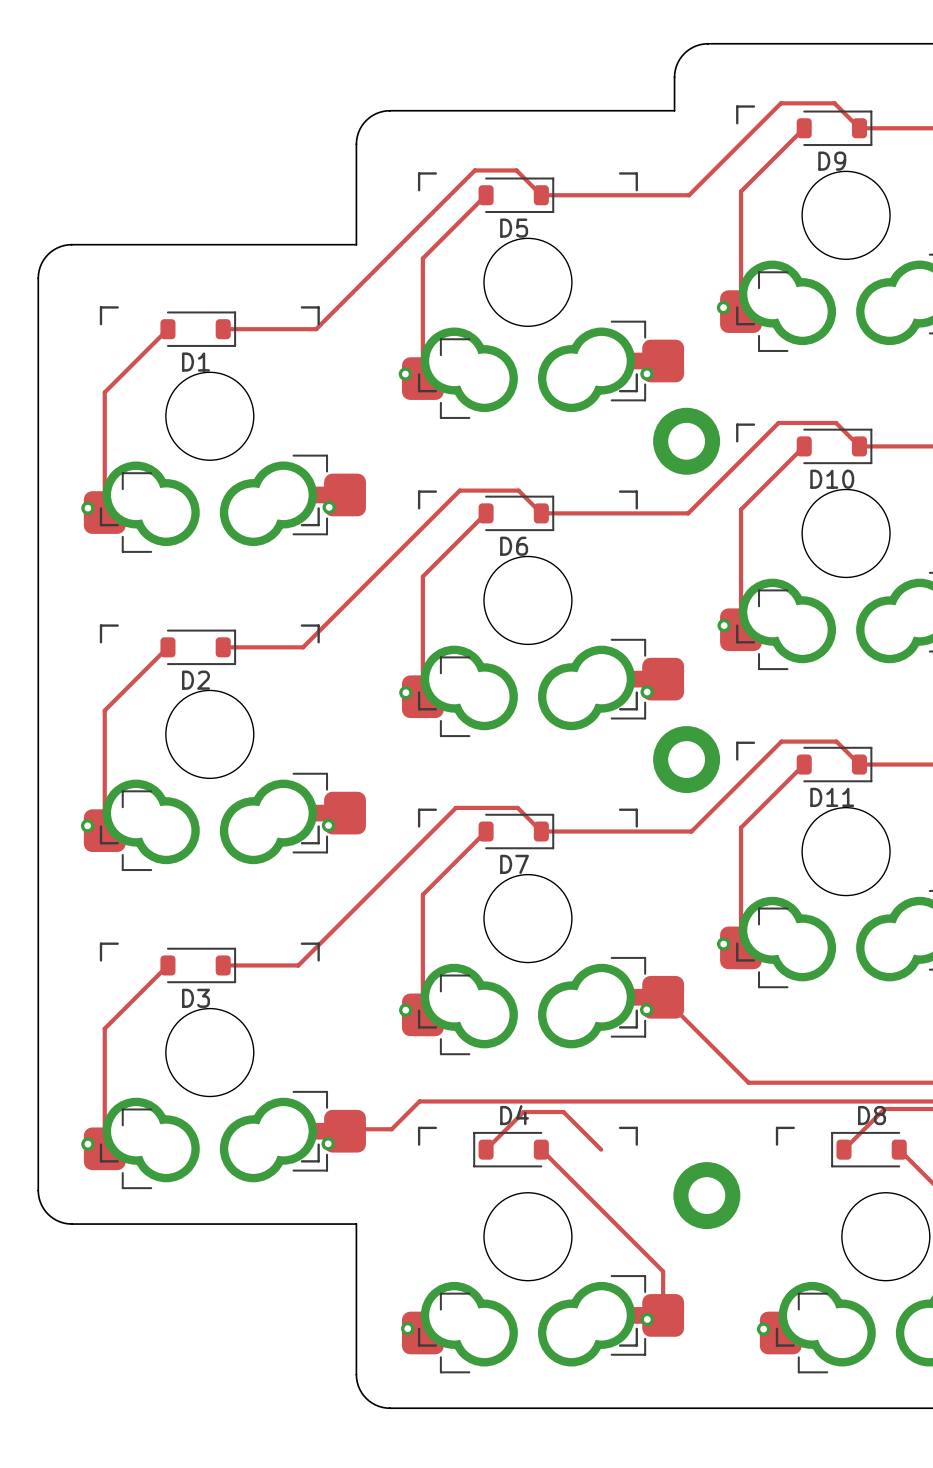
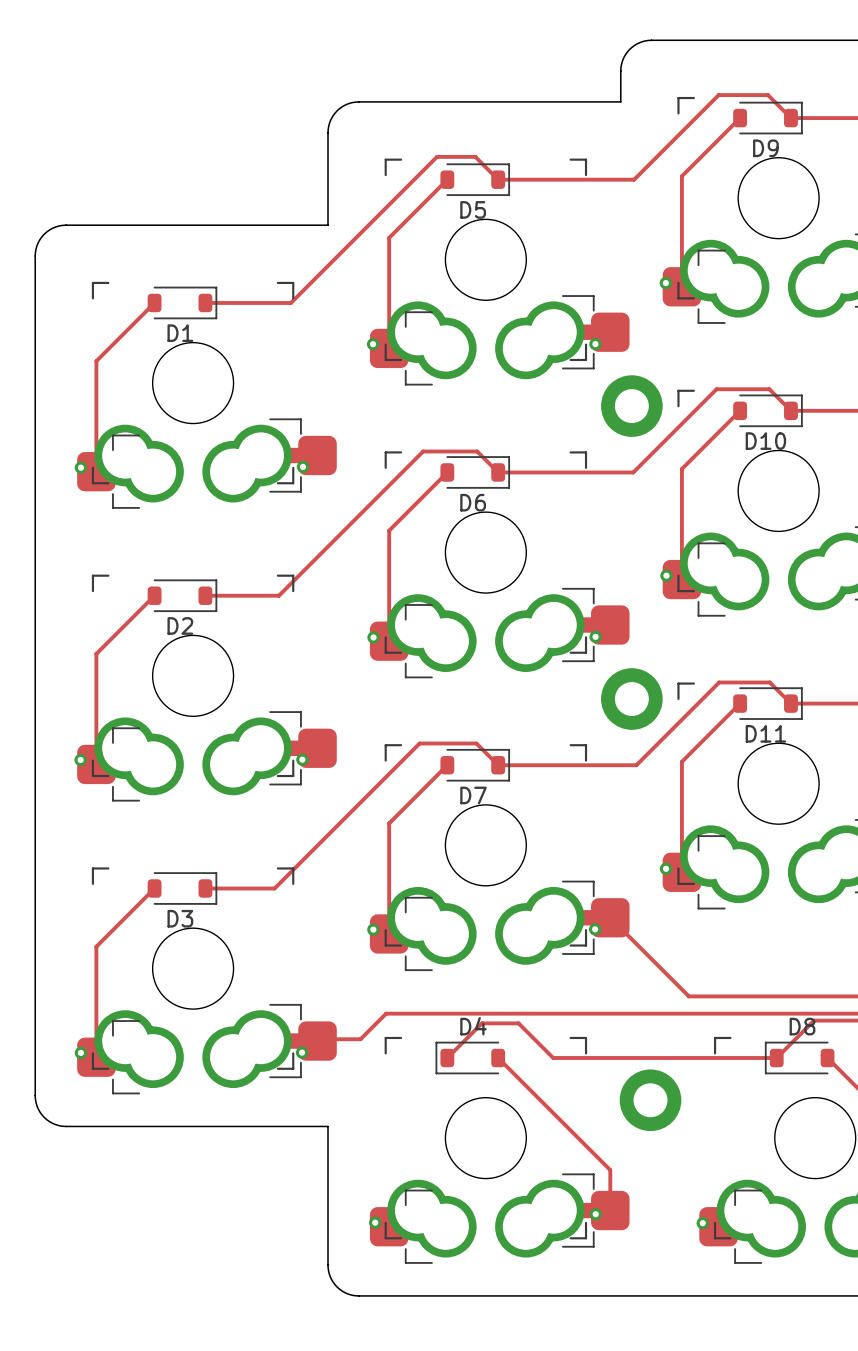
track: none -> (553, 1058) (776, 1058)

